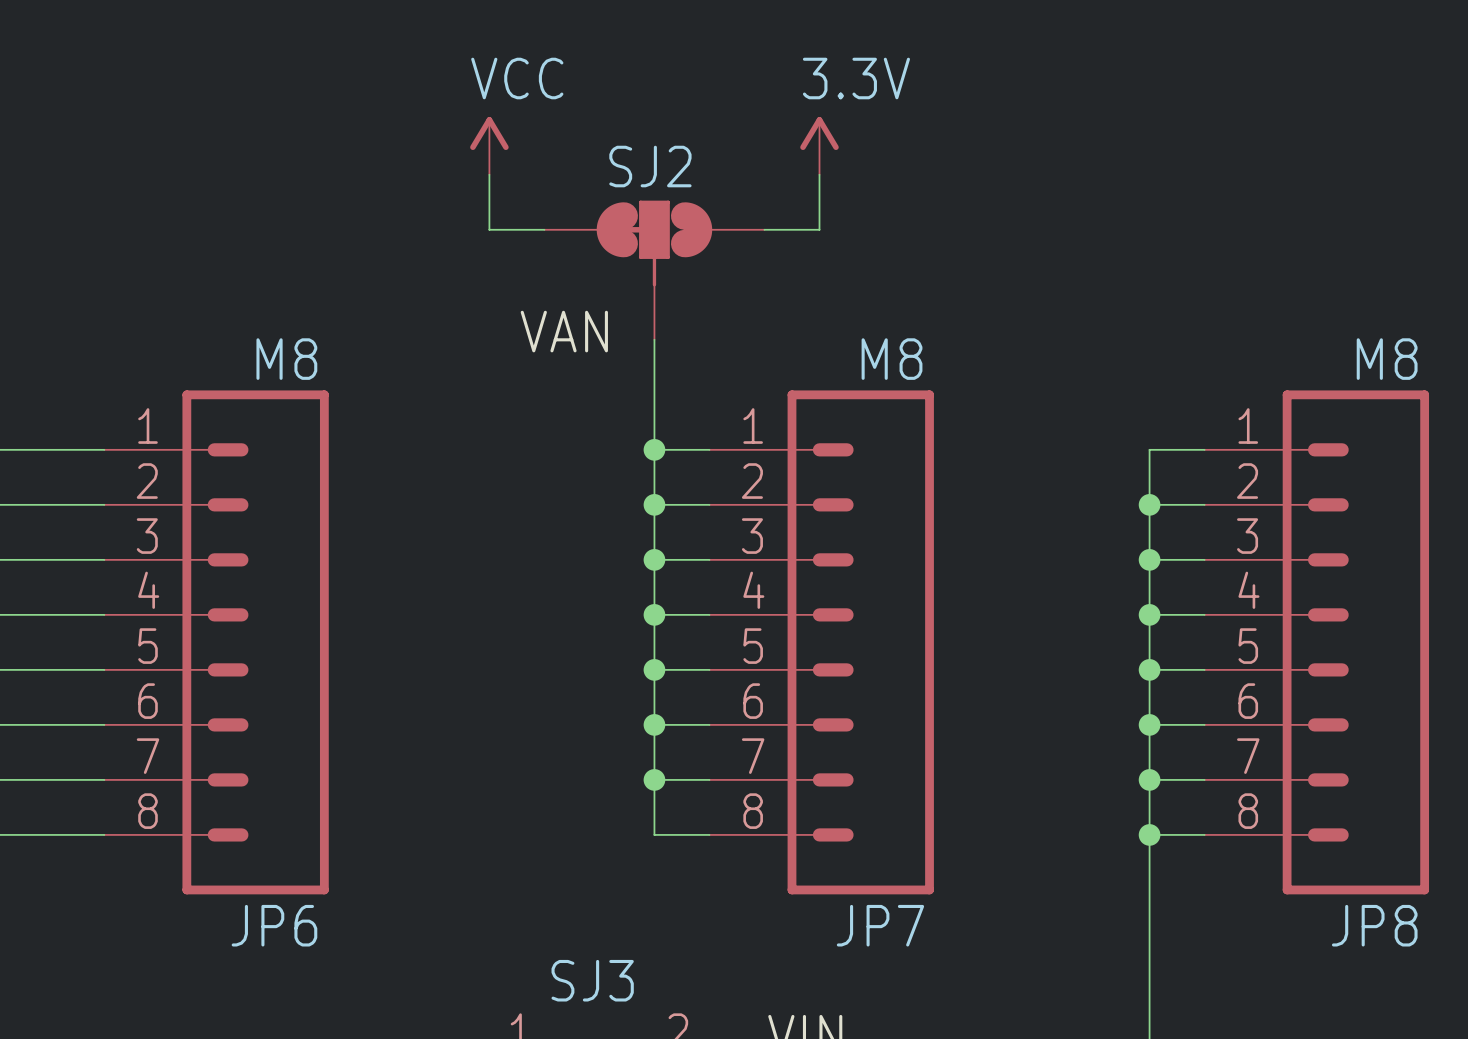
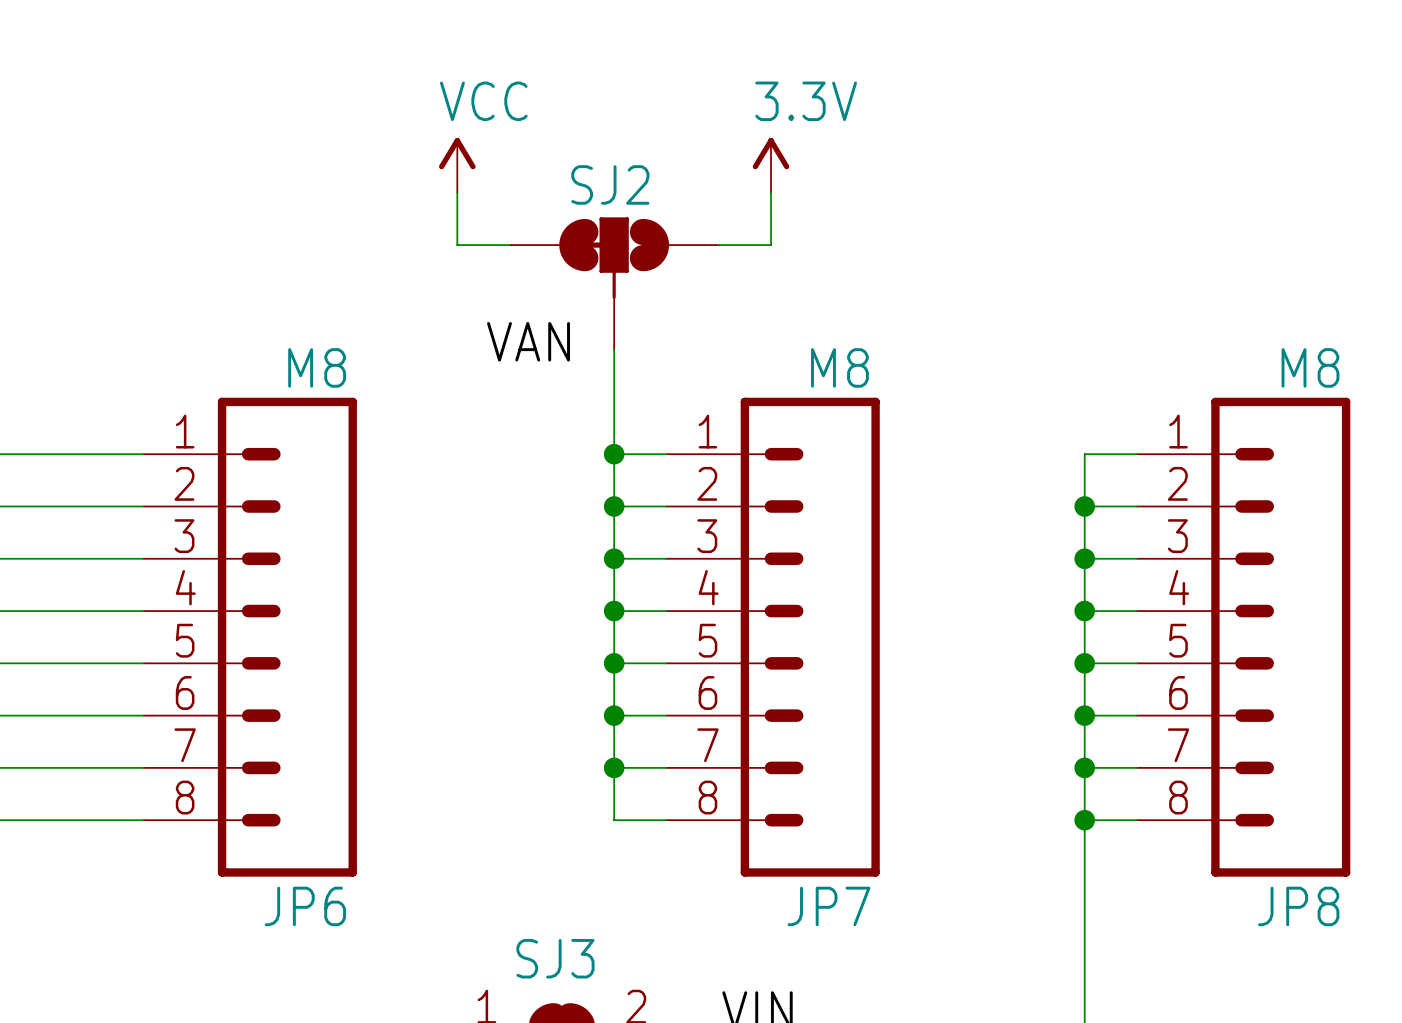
JP6 position: (216, 642) -> (250, 637)

